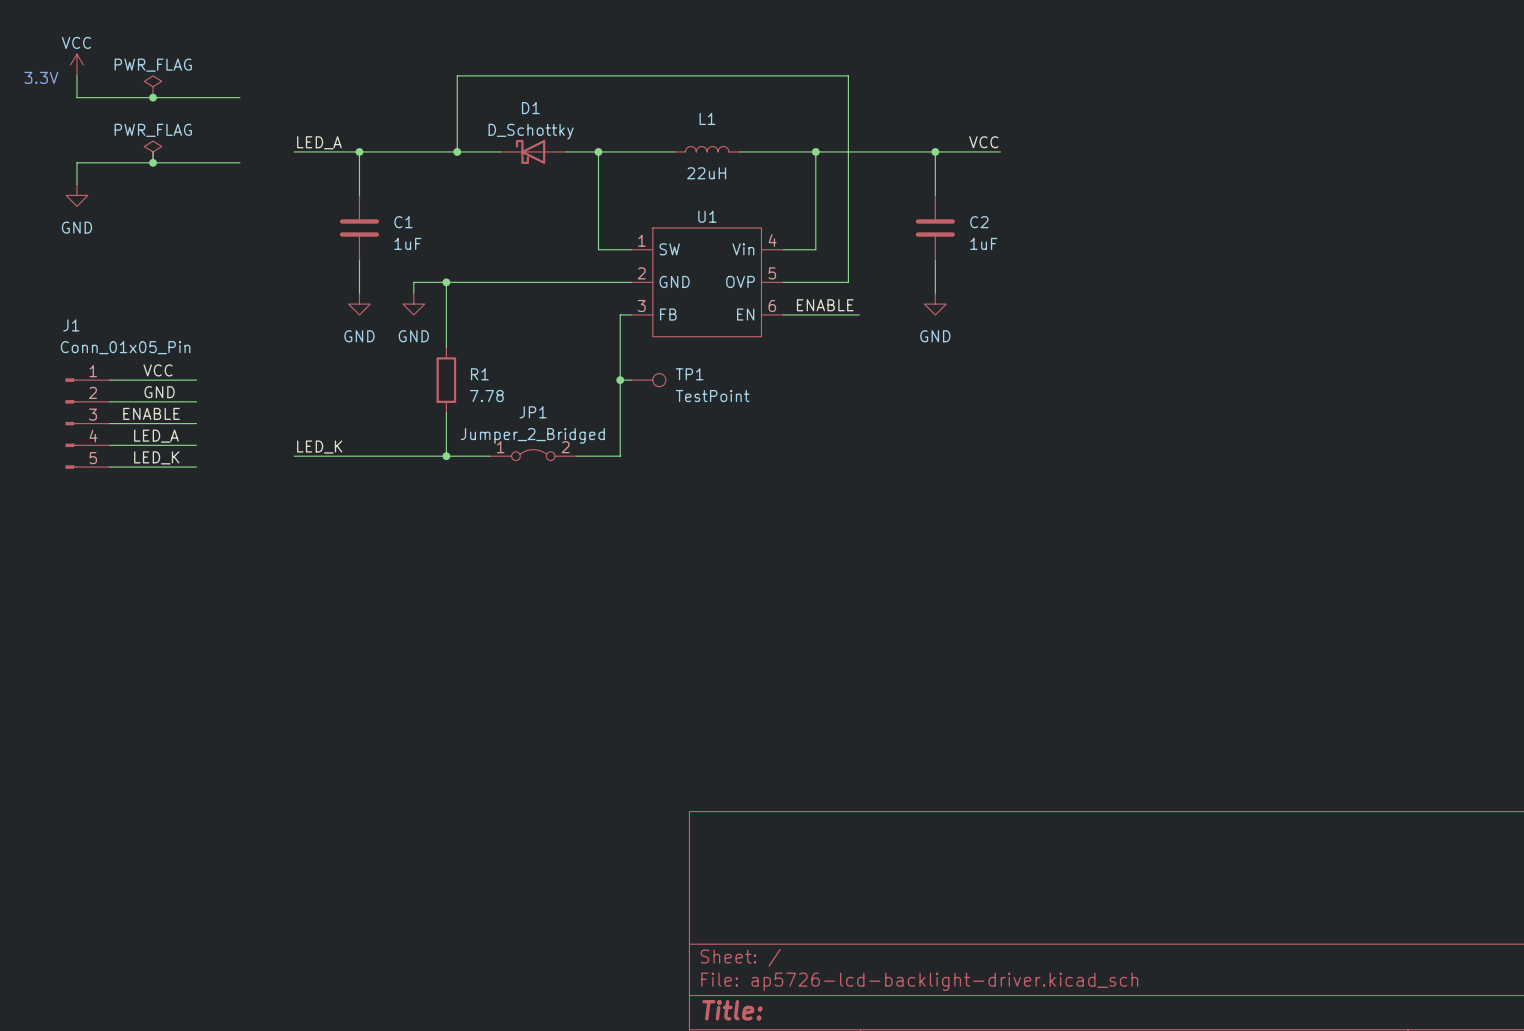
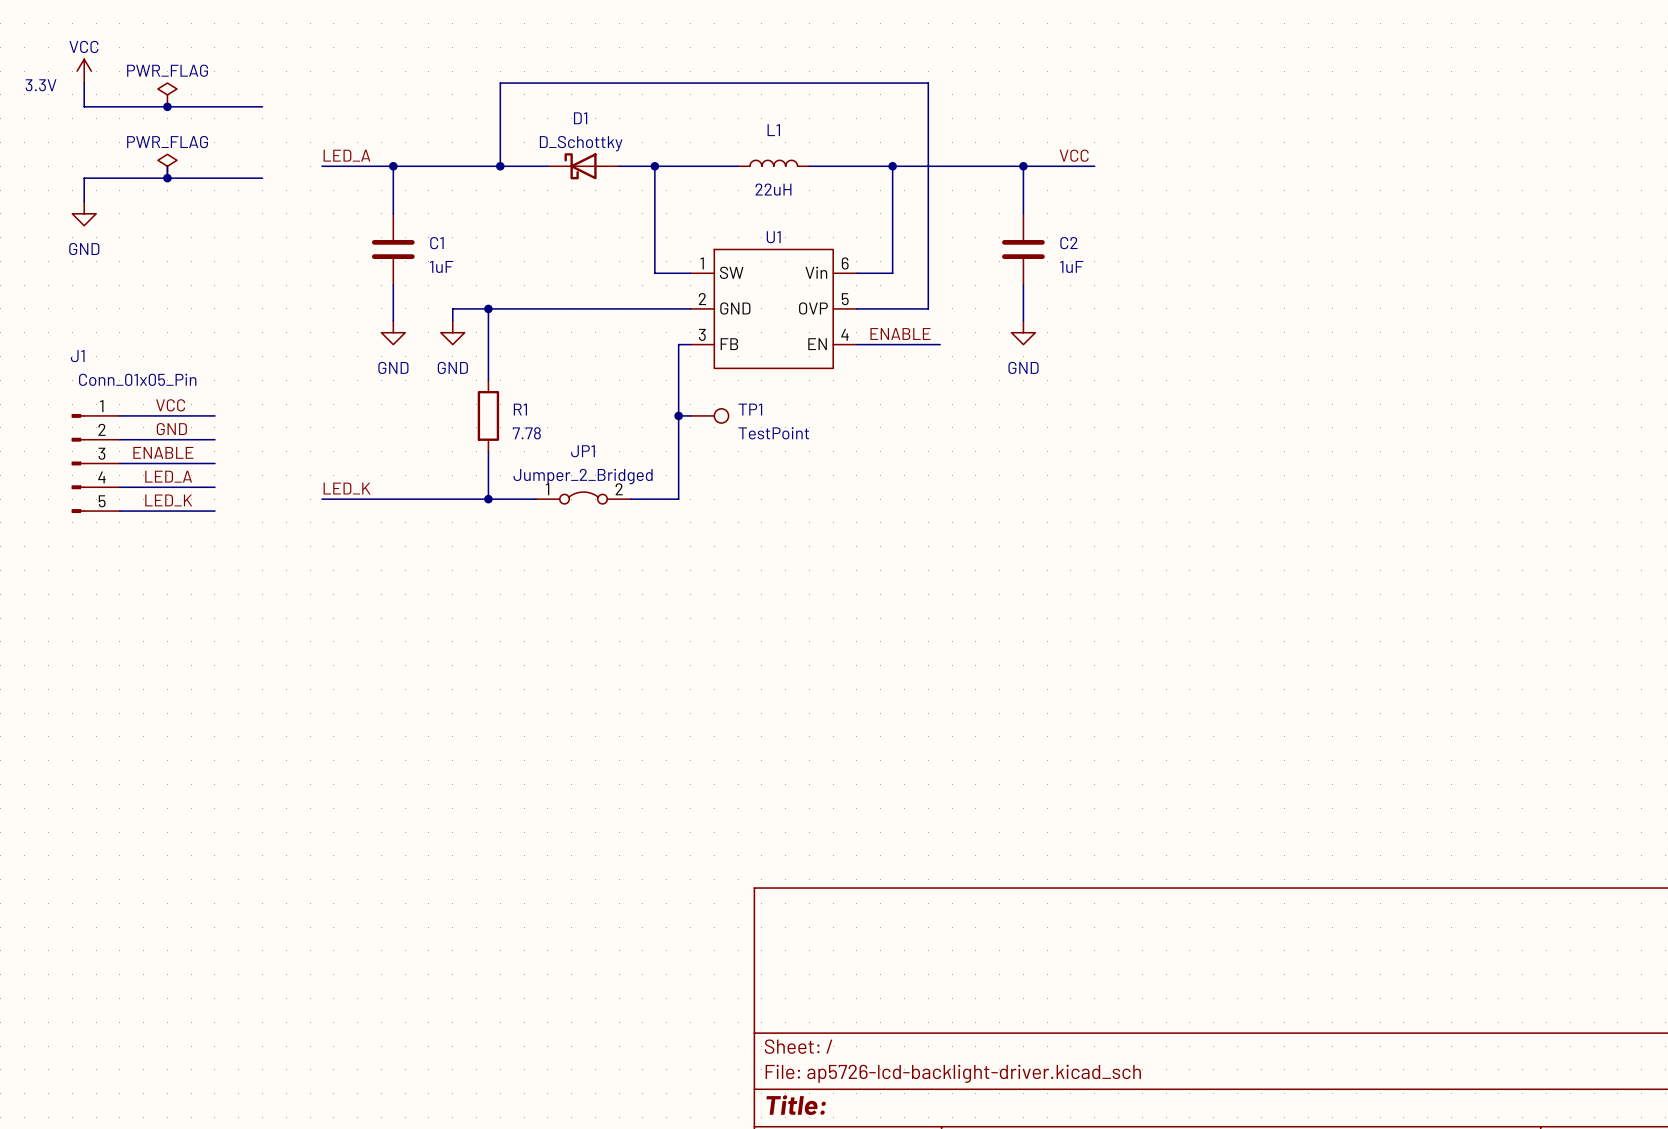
U1 pin number: 4 (772, 240) -> 6 (845, 263)
U1 pin number: 6 (772, 305) -> 4 (844, 334)

